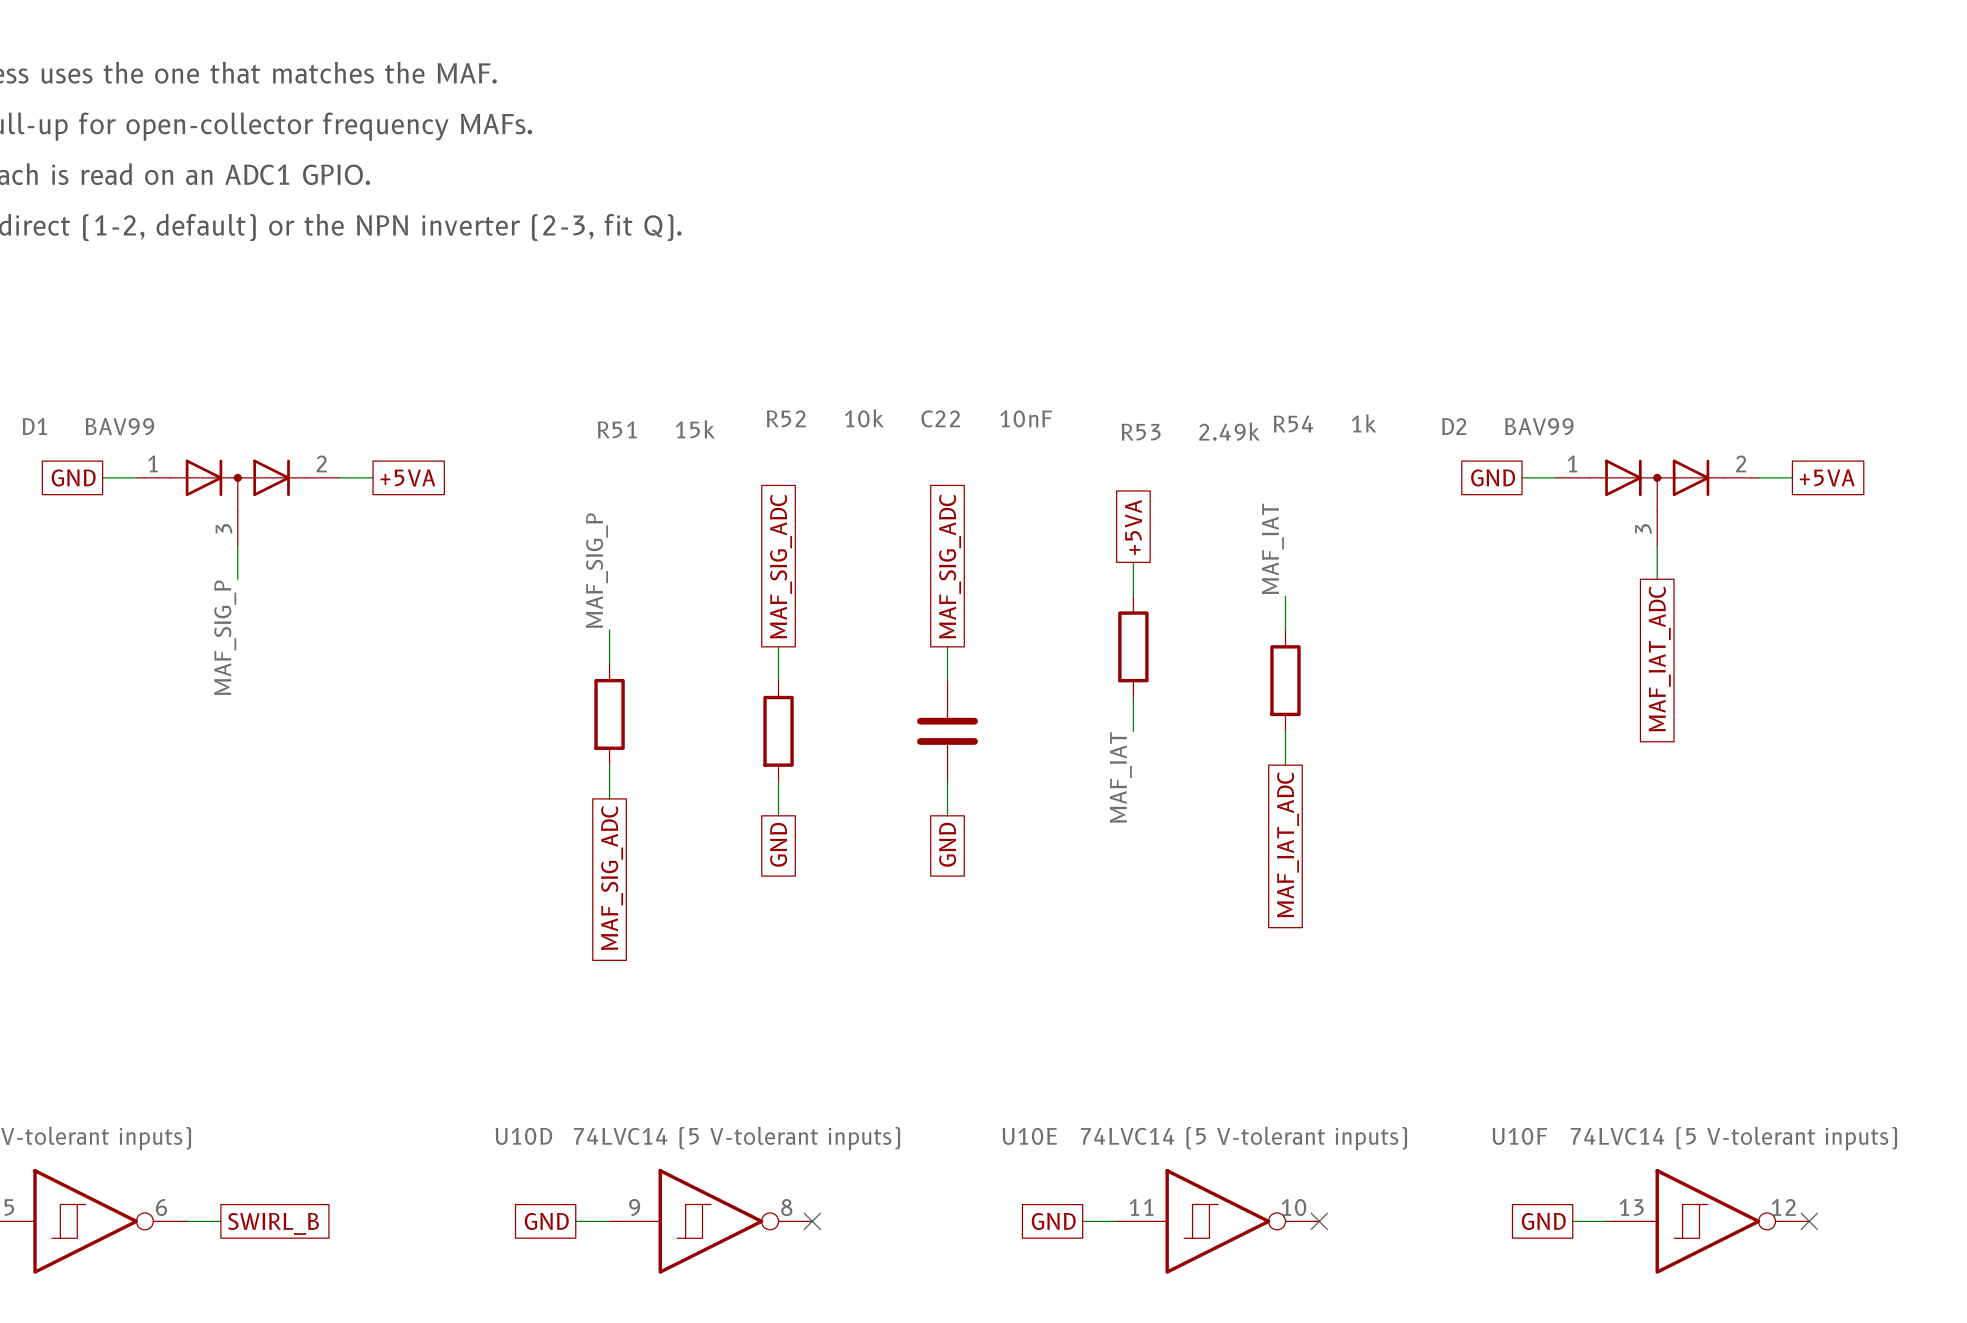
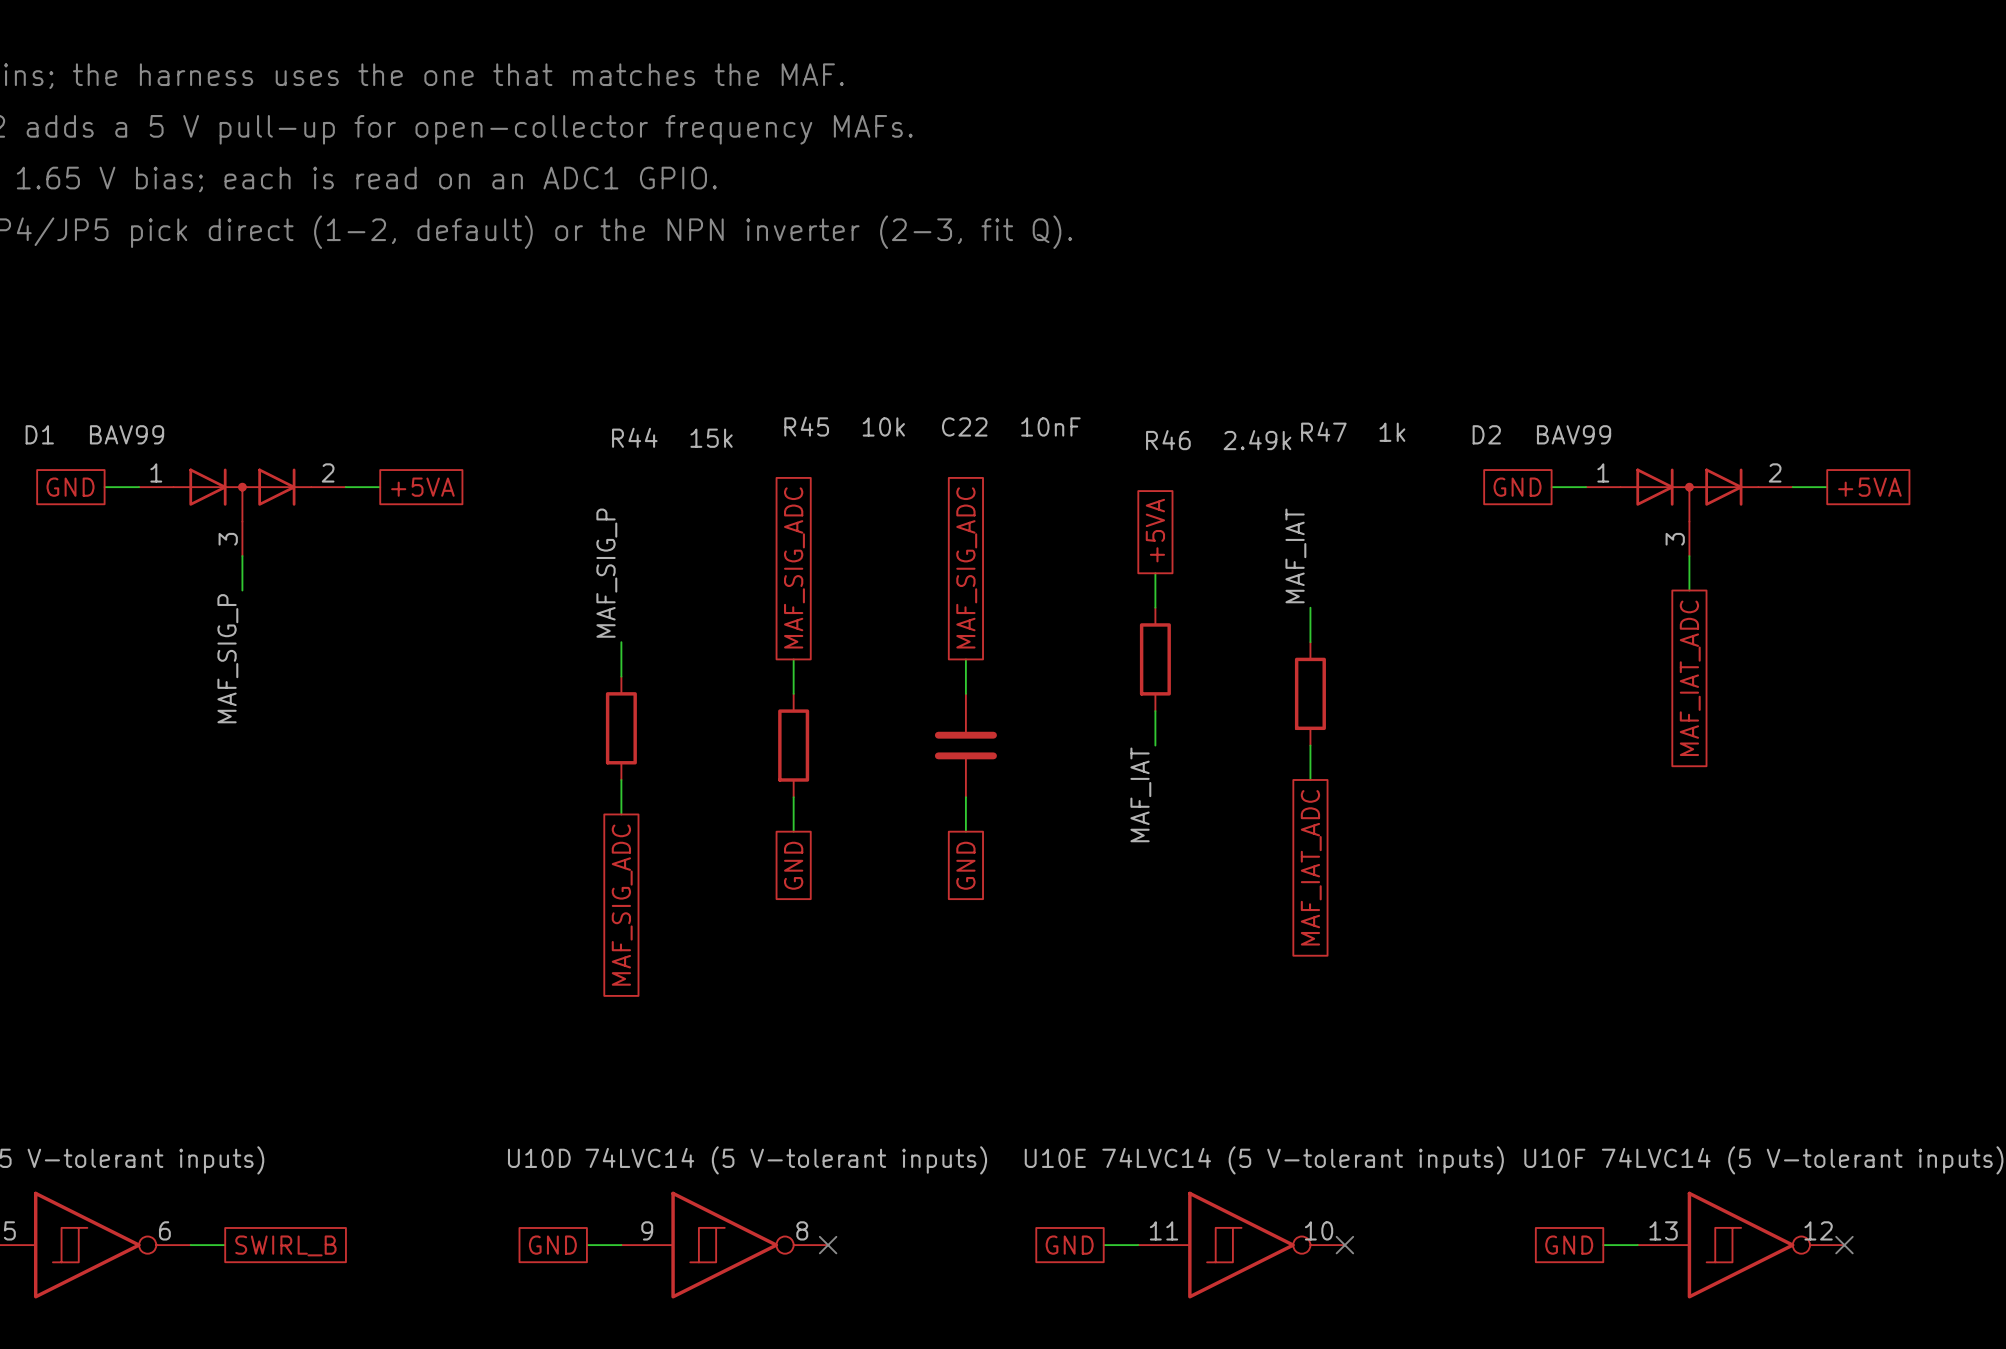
R52 name: R52 (786, 418) -> R45 (806, 426)
R54 name: R54 (1293, 424) -> R47 (1323, 431)
R51 name: R51 (617, 429) -> R44 (634, 437)
R53 name: R53 (1141, 432) -> R46 (1168, 440)

